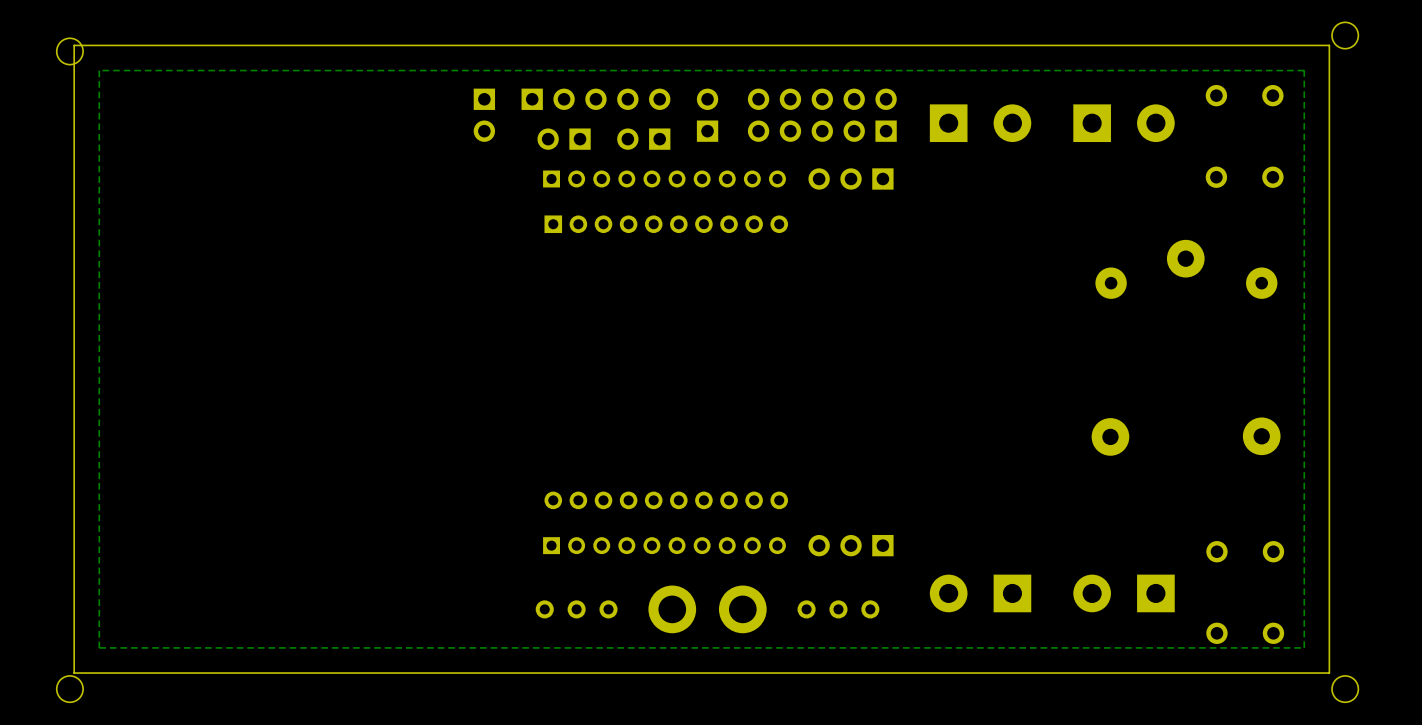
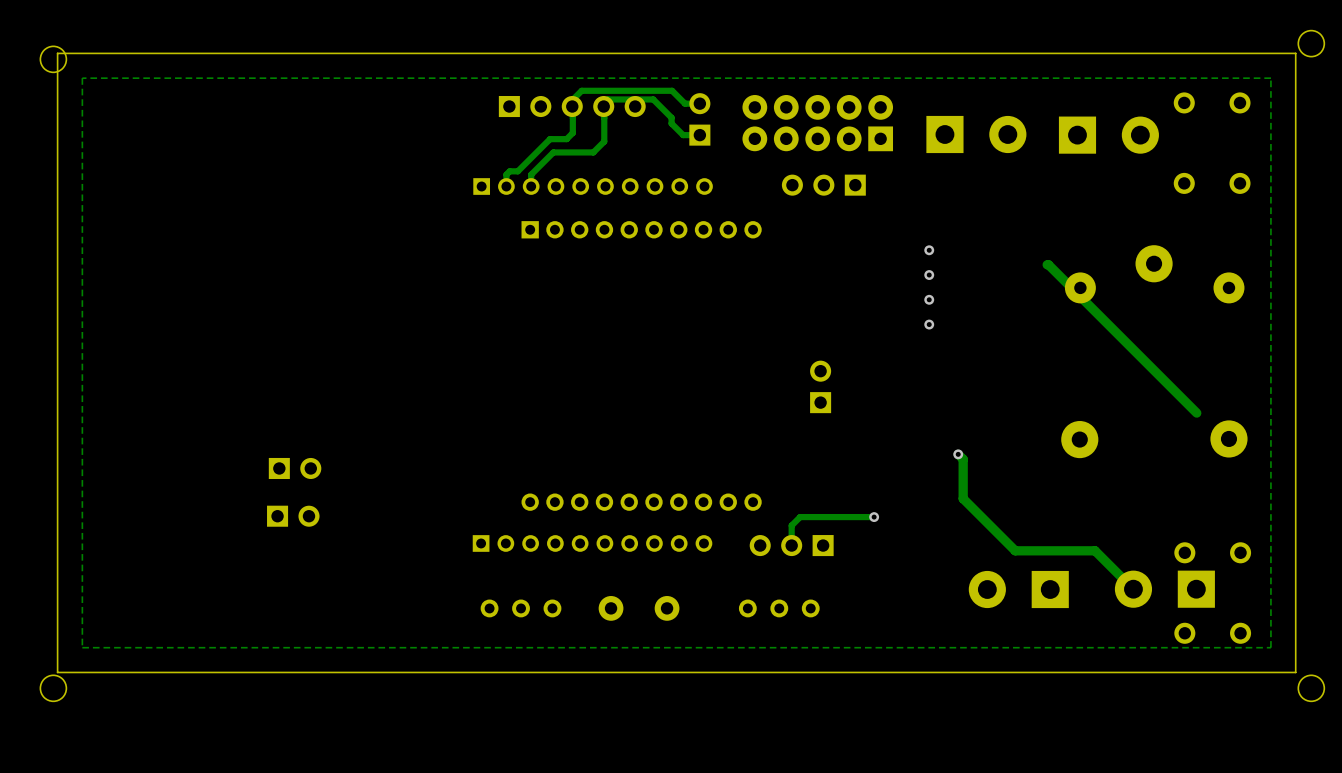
track: none -> (699, 103) (684, 103) (672, 90) (581, 90) (572, 99) (572, 132) (566, 139) (550, 139) (517, 171) (509, 171) (506, 174) (506, 186)
part: (484, 115) -> none
part position: (707, 115) -> (699, 119)
part: (822, 115) -> none
part: none -> (817, 123)
part position: (980, 123) -> (976, 134)
part position: (1124, 123) -> (1108, 135)
track: none -> (699, 135) (683, 135) (671, 123) (671, 117) (653, 99) (608, 99) (604, 103) (604, 141) (593, 152) (553, 152) (531, 174) (531, 186)
part: (564, 139) -> none
part: (643, 139) -> none
part position: (664, 178) -> (593, 186)
via: none -> (929, 250)
track: none -> (1047, 264) (1196, 413)
via: none -> (929, 275)
via: none -> (929, 299)
via: none -> (929, 324)
part: none -> (820, 386)
track: none -> (958, 454) (963, 459) (963, 498) (1015, 550) (1095, 550) (1133, 589)
via: none -> (958, 454)
part: none -> (295, 468)
part: none -> (293, 516)
track: none -> (874, 517) (800, 517) (791, 525) (791, 545)
via: none -> (874, 517)
part position: (664, 545) -> (592, 543)
part position: (851, 545) -> (791, 545)
part: none -> (1018, 589)
part: none -> (1164, 589)
part: (980, 593) -> none
part: (1124, 593) -> none
part: none -> (611, 608)
part: none -> (667, 608)
part position: (576, 609) -> (521, 608)
part: (672, 609) -> none
part: (742, 609) -> none
part position: (838, 609) -> (779, 608)

